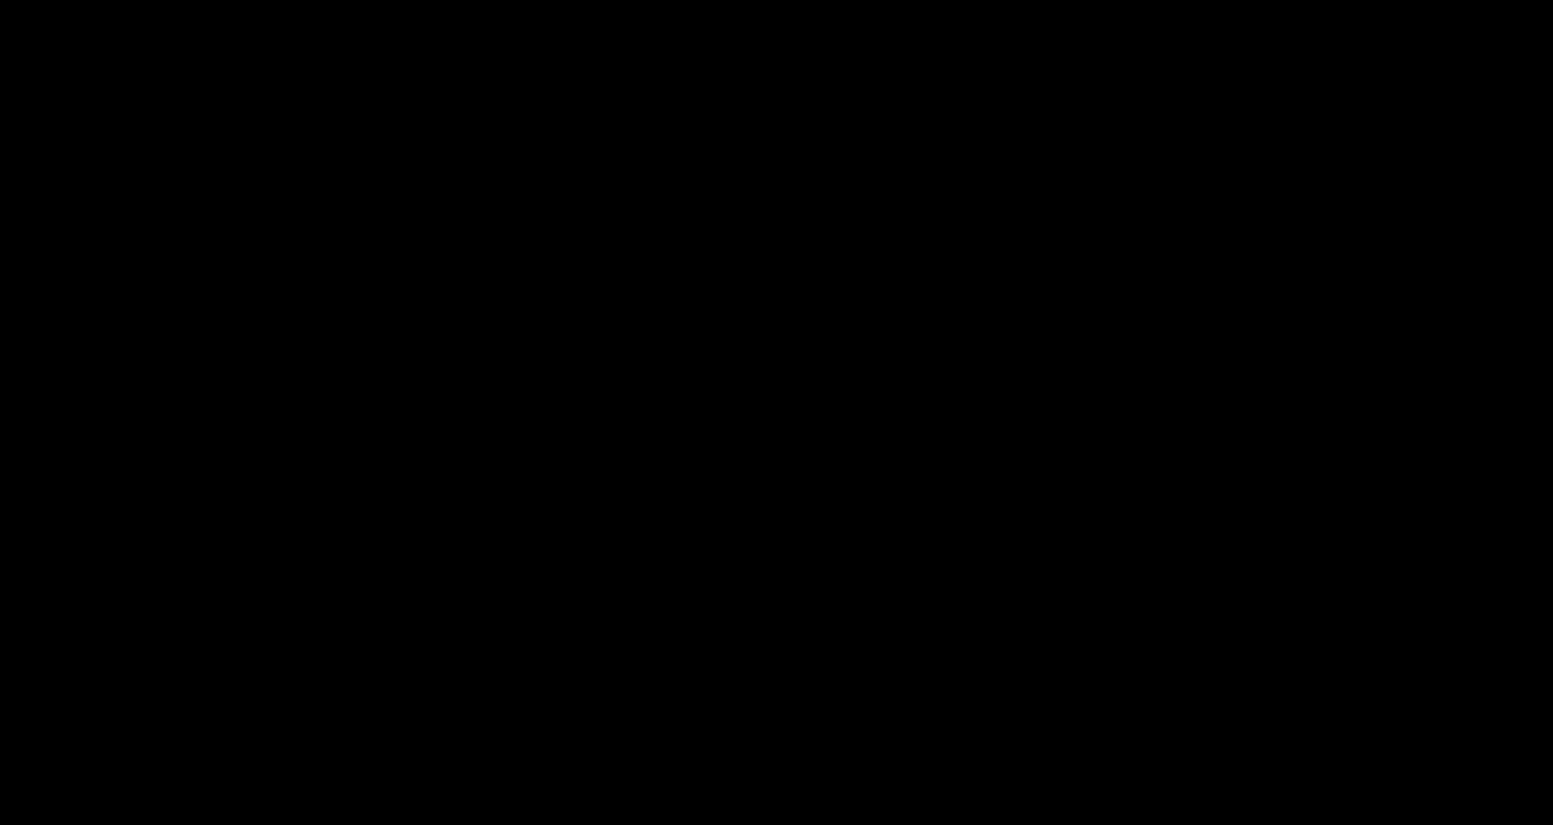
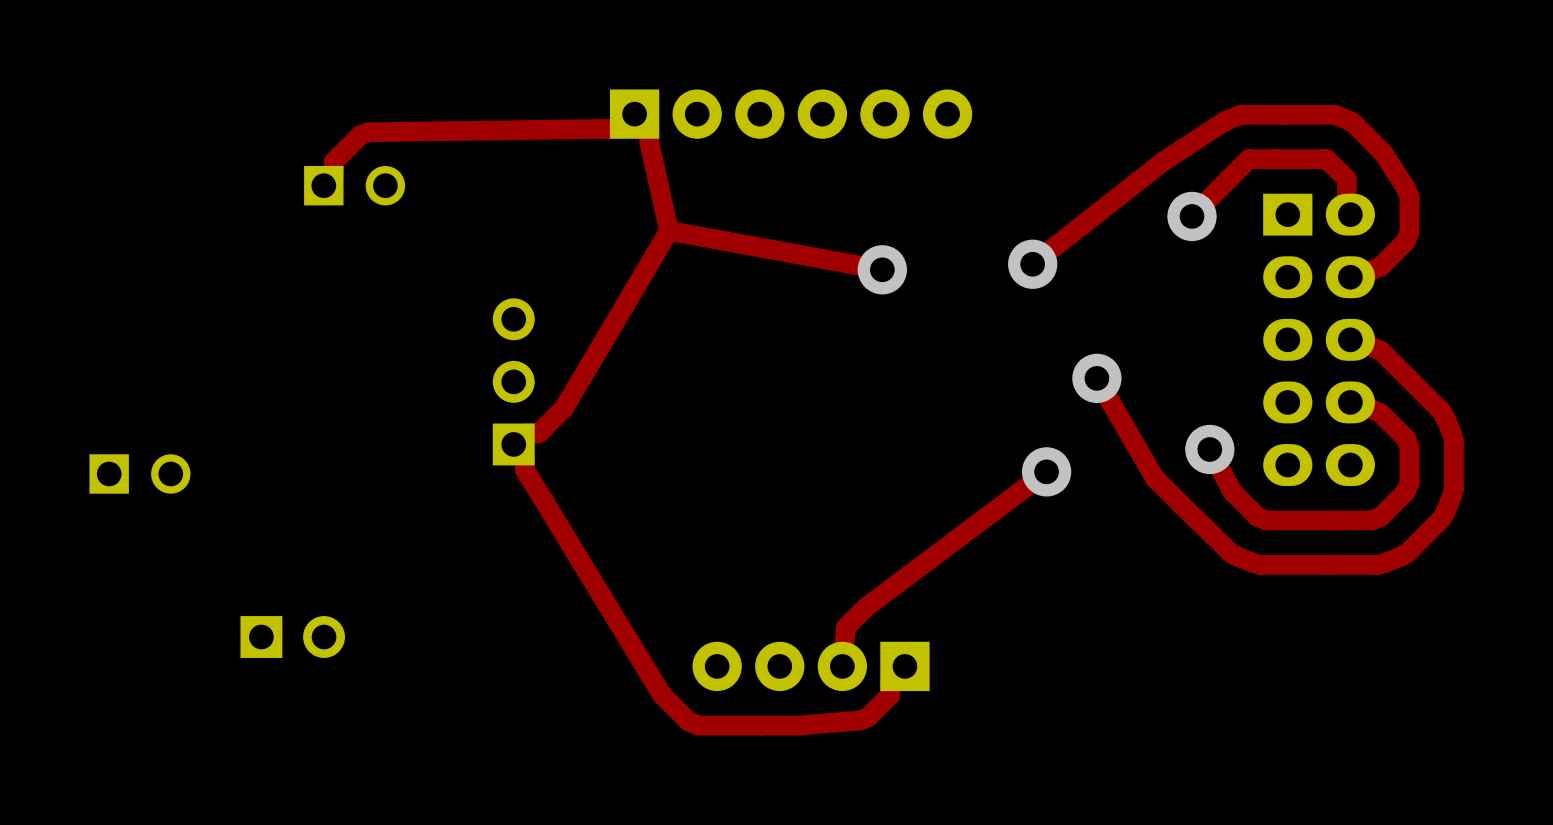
part: none -> (791, 114)
track: none -> (323, 185) (333, 175) (333, 161) (359, 135) (368, 132) (619, 128) (634, 114) (649, 128) (649, 142) (669, 230)
part: none -> (354, 185)
track: none -> (1350, 214) (1346, 214) (1346, 178) (1327, 159) (1249, 159) (1192, 216)
via: none -> (1192, 216)
track: none -> (669, 230) (882, 269)
track: none -> (669, 230) (564, 407) (538, 433) (524, 433) (513, 444) (524, 455) (524, 469) (662, 695) (688, 721) (698, 725) (798, 725) (859, 720) (868, 717) (890, 695) (890, 681) (904, 666)
track: none -> (1032, 264) (1163, 161) (1225, 121) (1241, 114) (1333, 114) (1353, 122) (1383, 152) (1409, 196) (1409, 232) (1405, 241) (1380, 266) (1350, 277)
via: none -> (1032, 264)
via: none -> (882, 269)
part: none -> (1319, 339)
track: none -> (1350, 339) (1380, 350) (1441, 411) (1453, 441) (1453, 488) (1441, 518) (1407, 552) (1377, 564) (1260, 564) (1230, 552) (1154, 478) (1096, 378)
via: none -> (1096, 378)
part: none -> (513, 381)
track: none -> (1350, 402) (1380, 413) (1405, 438) (1409, 447) (1409, 482) (1405, 491) (1380, 516) (1371, 520) (1266, 520) (1257, 516) (1232, 491) (1209, 449)
via: none -> (1209, 449)
track: none -> (1046, 471) (865, 607) (845, 628) (842, 666)
via: none -> (1046, 471)
part: none -> (139, 473)
part: none -> (292, 637)
part: none -> (811, 666)

